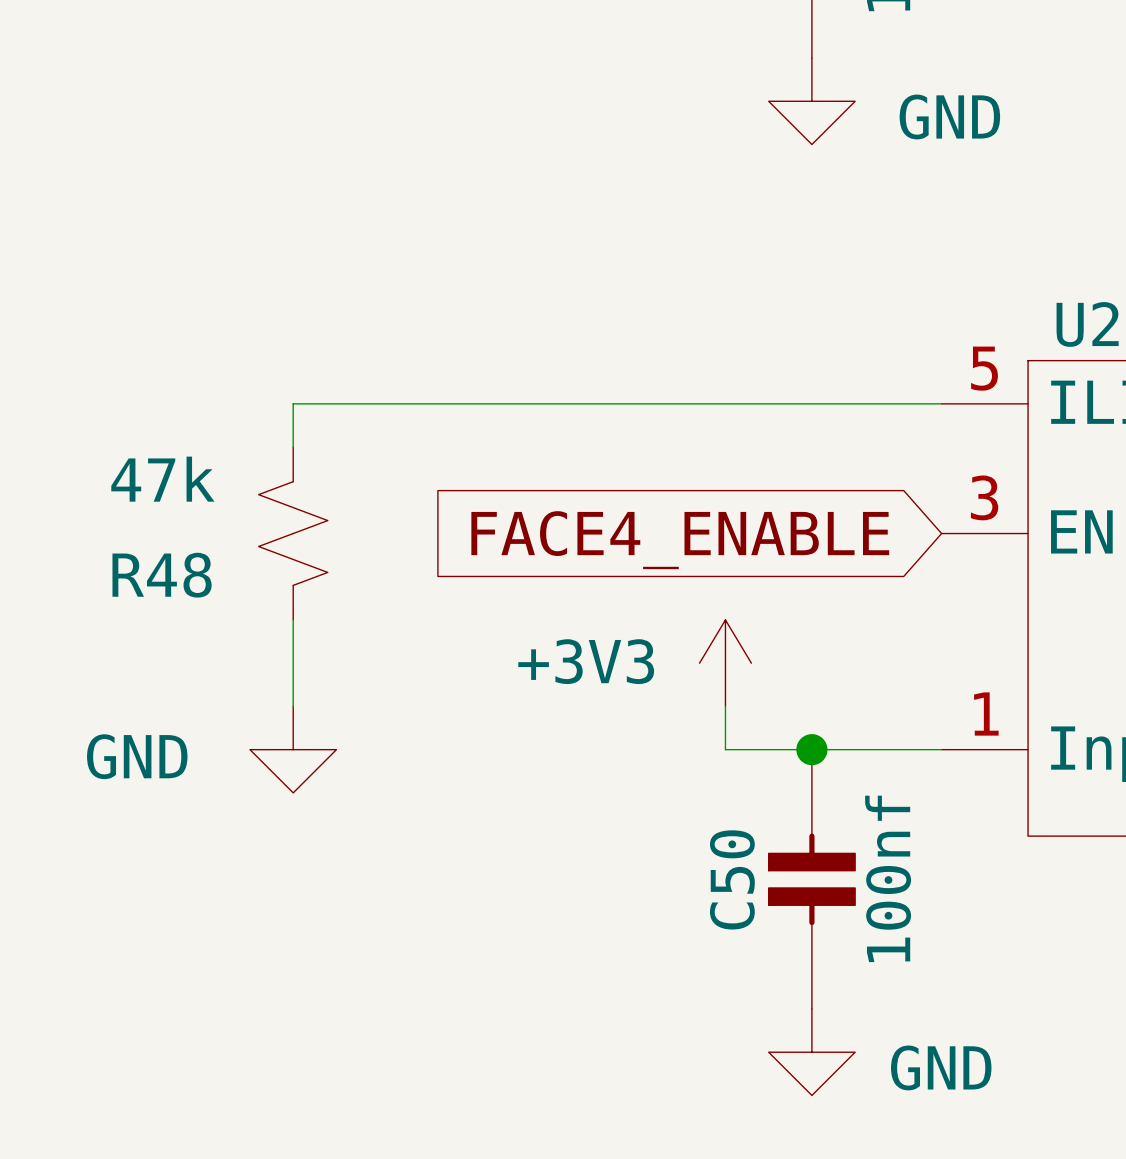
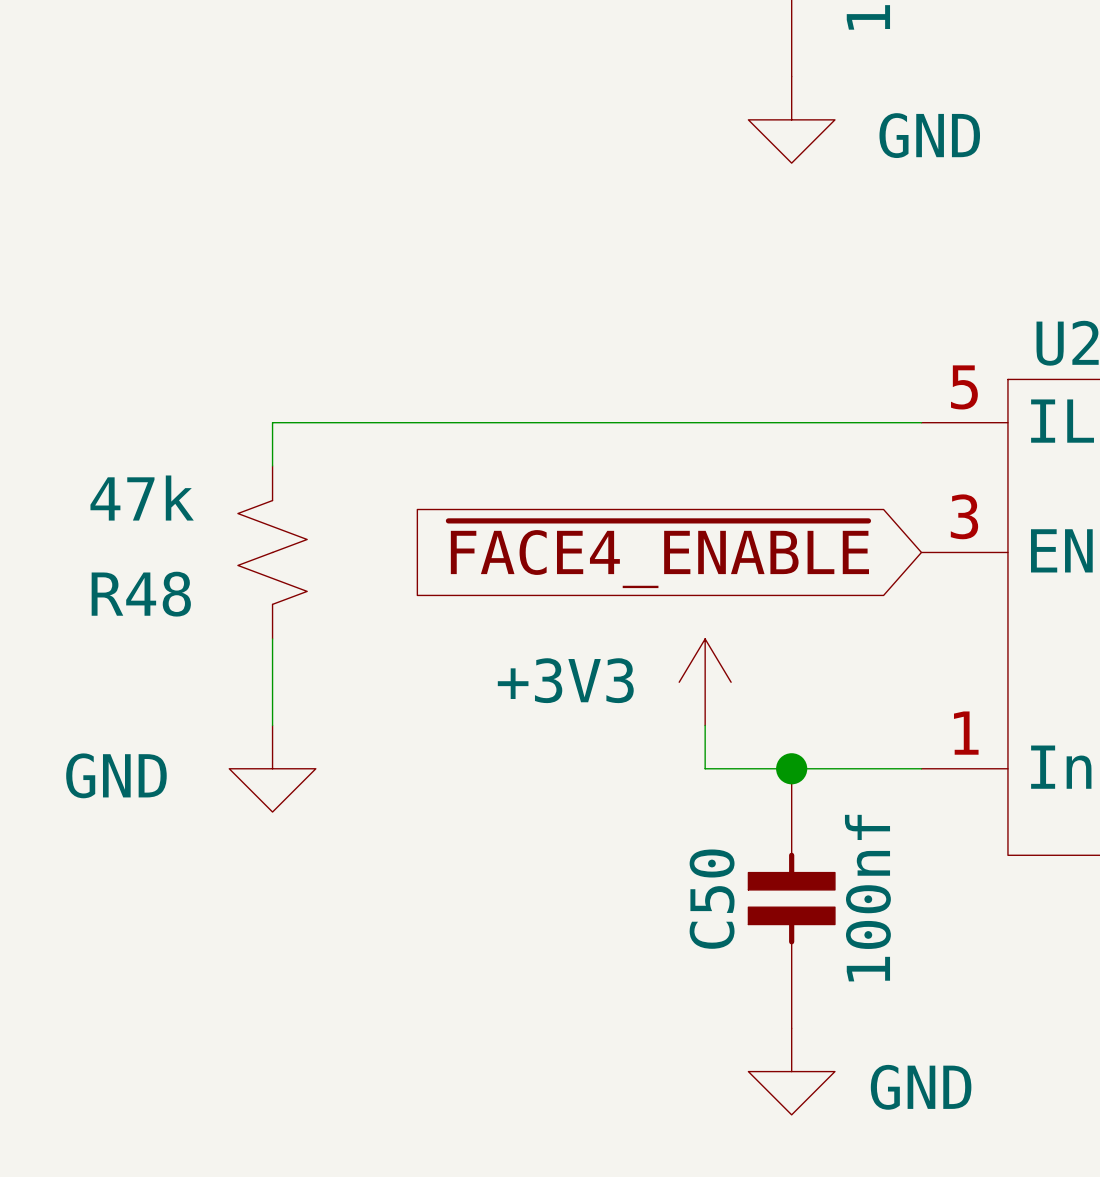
global label: FACE4_ENABLE (680, 540) -> ~{FACE4_ENABLE} (658, 554)

